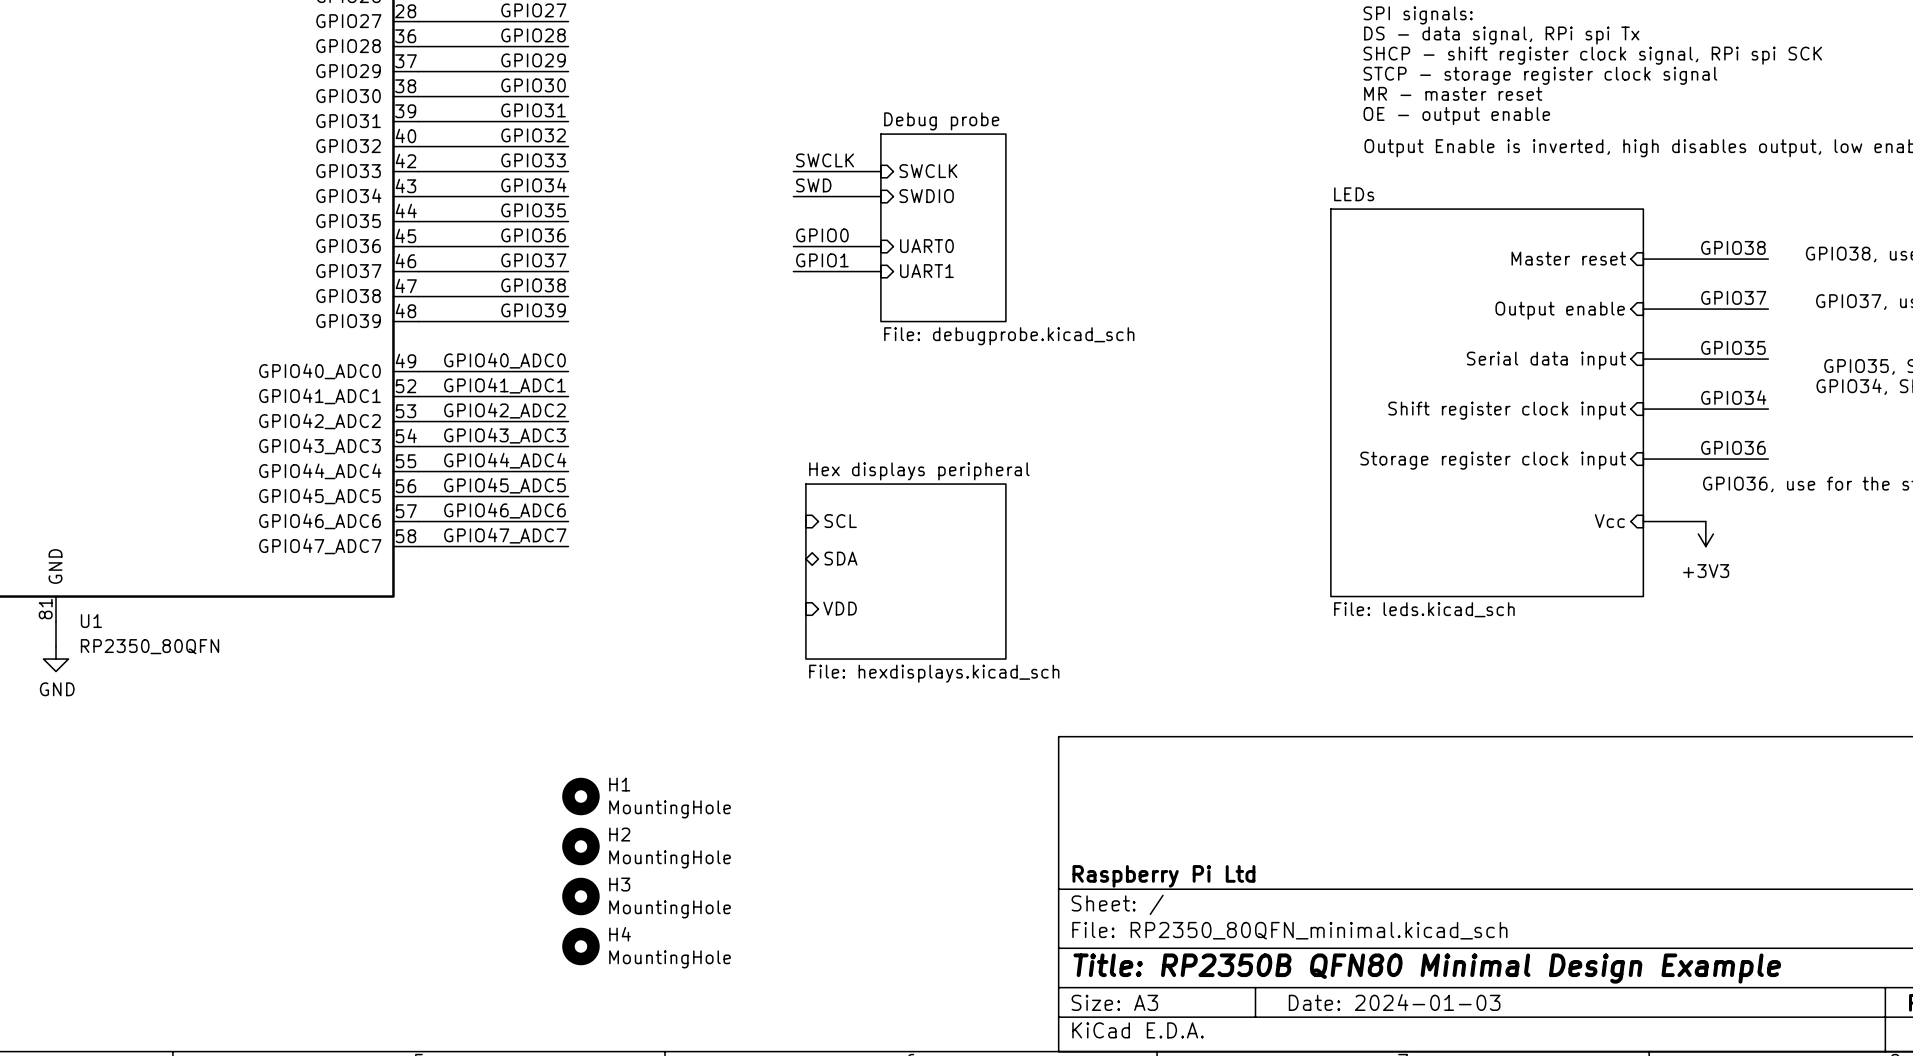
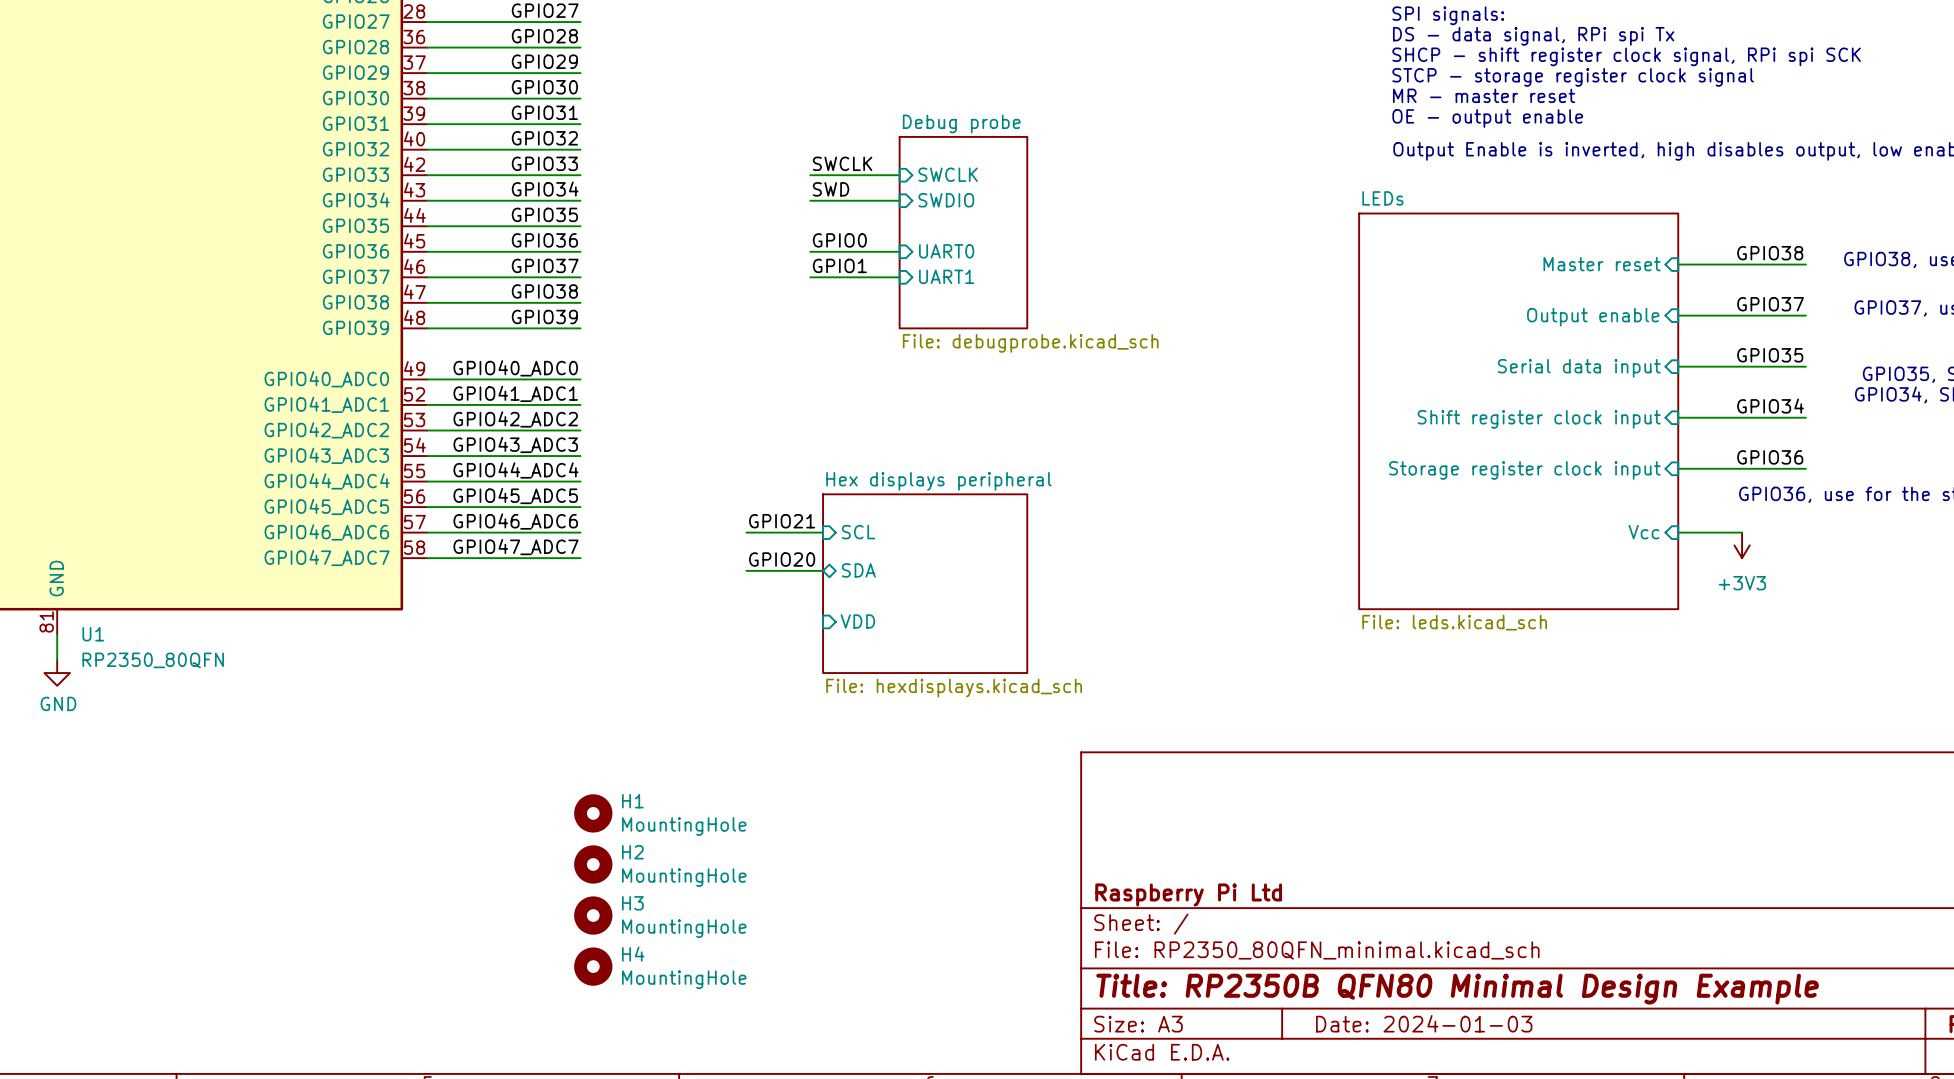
label: none -> GPIO21 (782, 521)
wire: none -> (746, 532) (823, 532)
label: none -> GPIO20 (782, 559)
wire: none -> (746, 570) (823, 570)

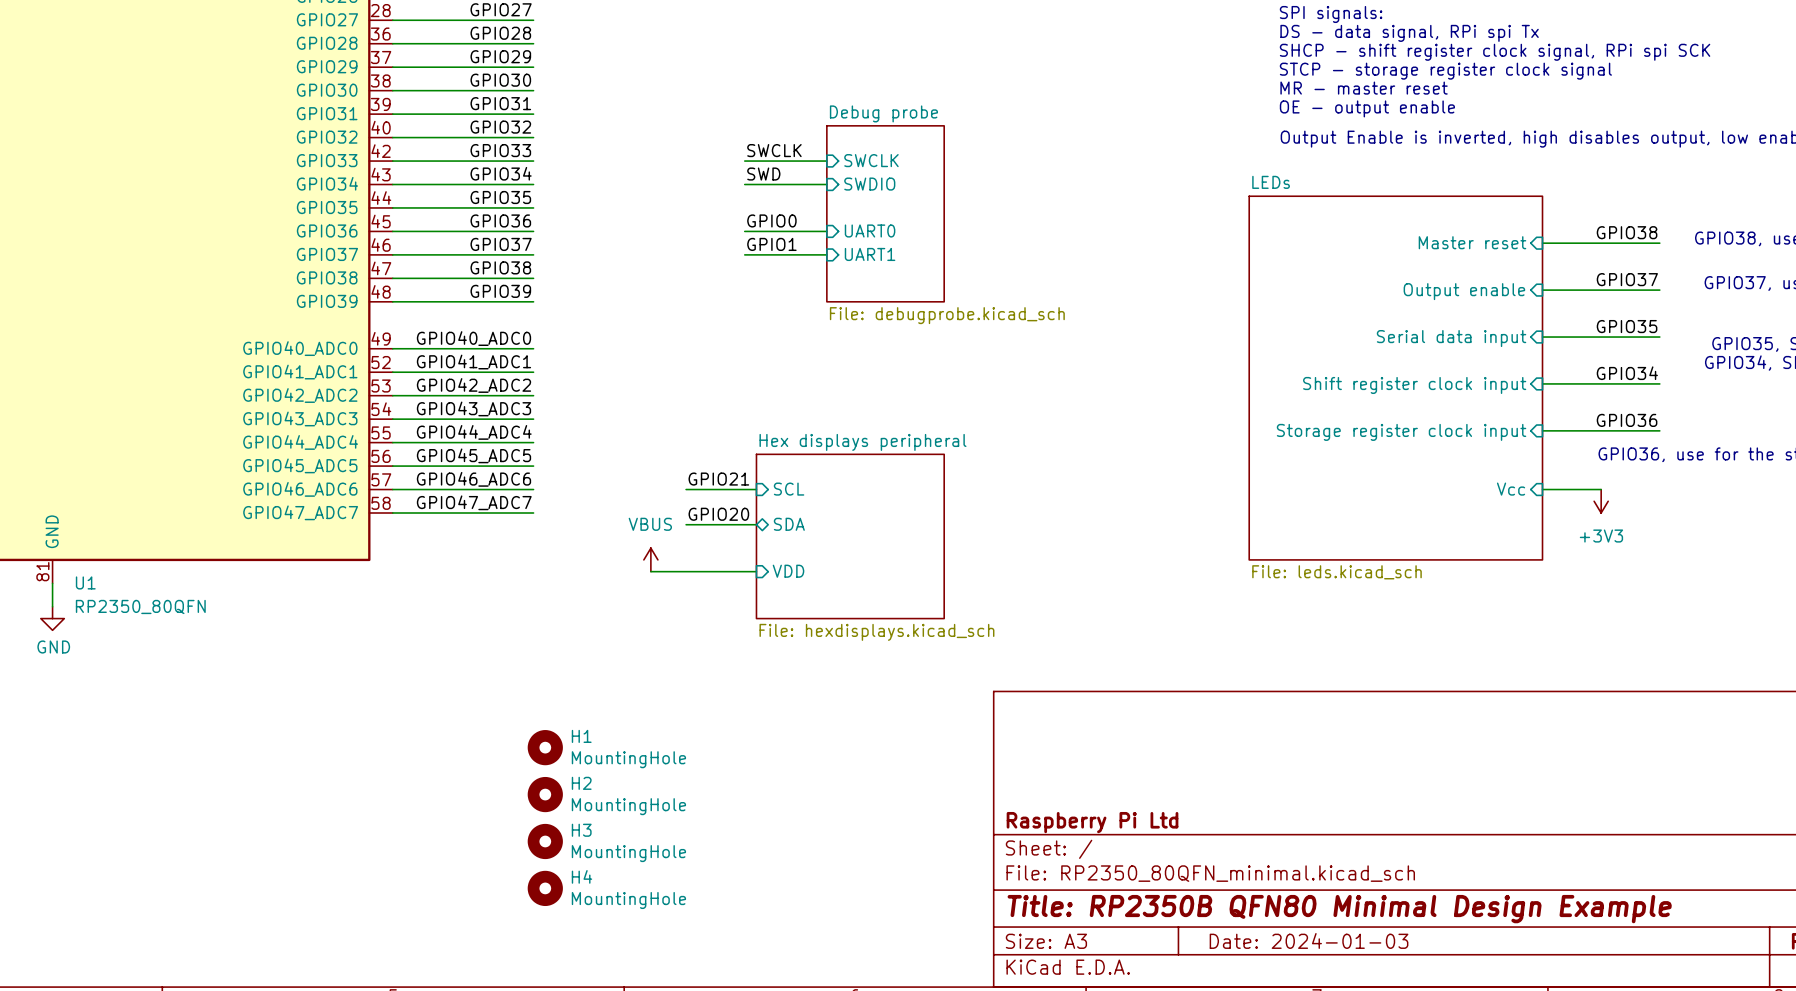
power symbol: none -> VBUS (650, 559)
wire: none -> (650, 571) (756, 571)

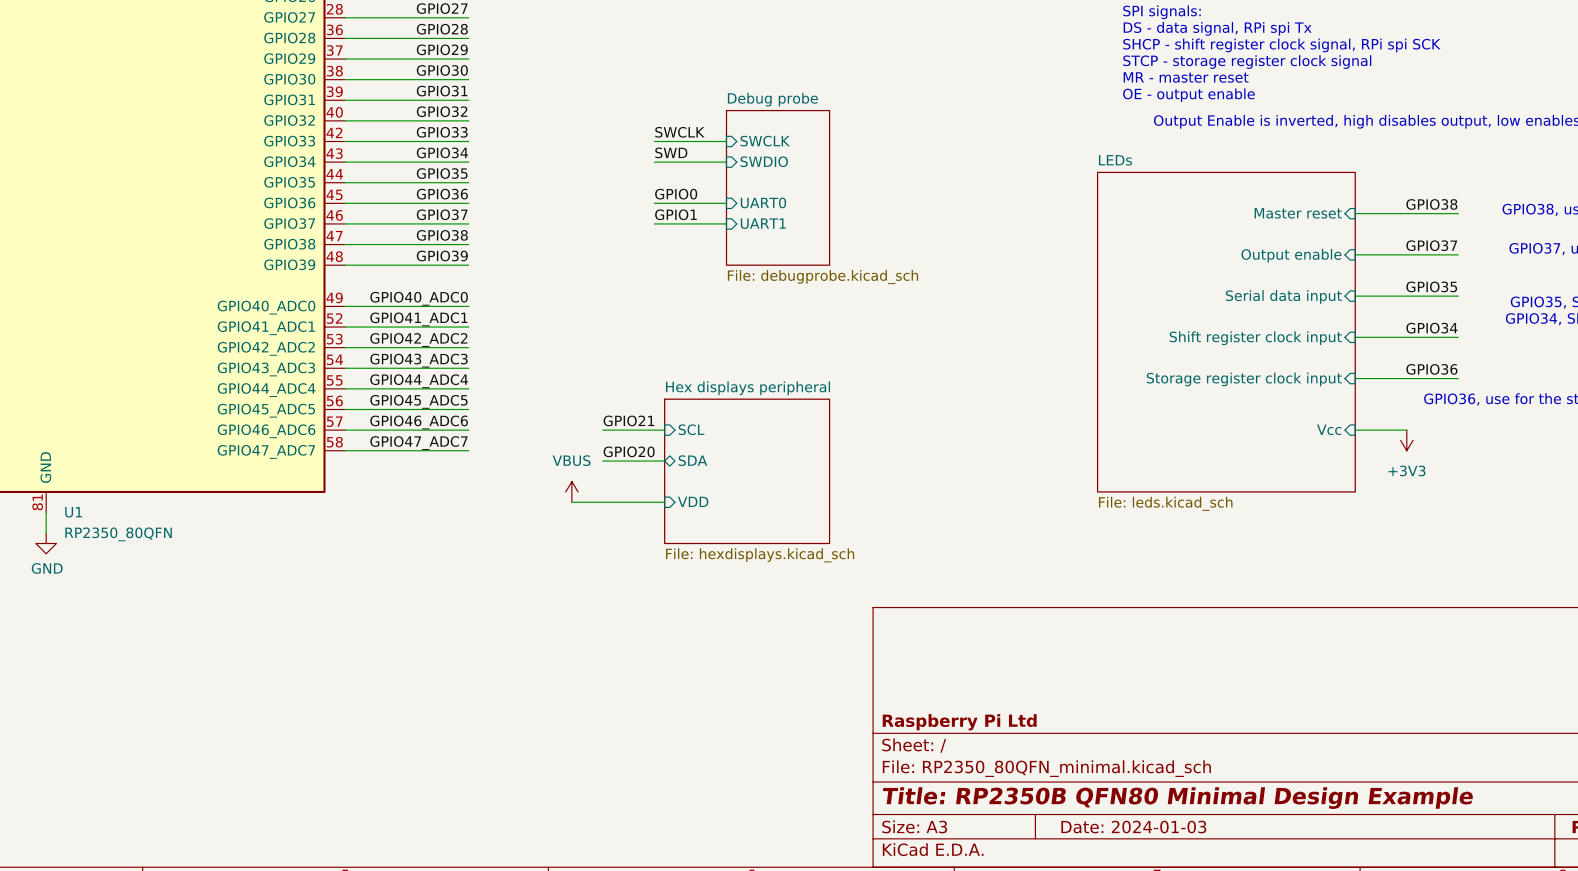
H1: MountingHole (545, 747) -> none
H2: MountingHole (545, 794) -> none
H3: MountingHole (545, 841) -> none
H4: MountingHole (545, 888) -> none

